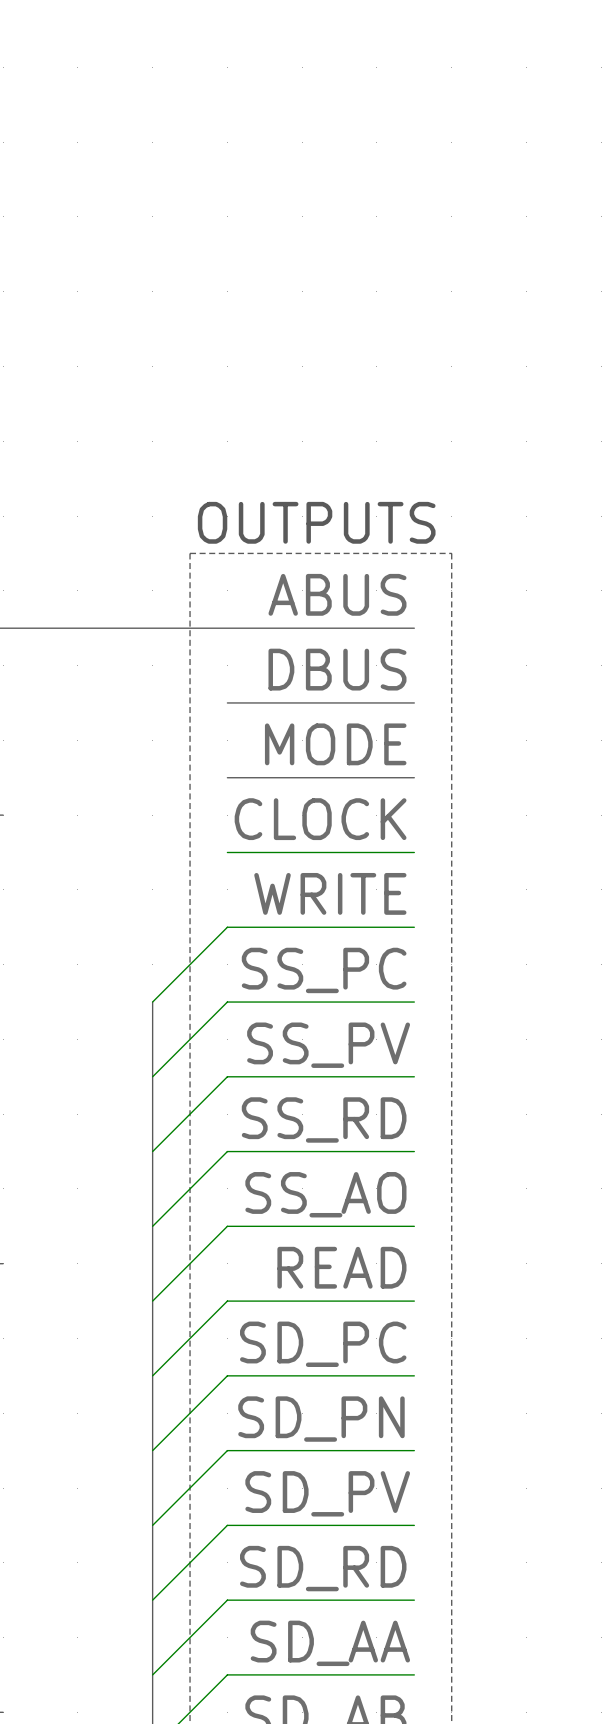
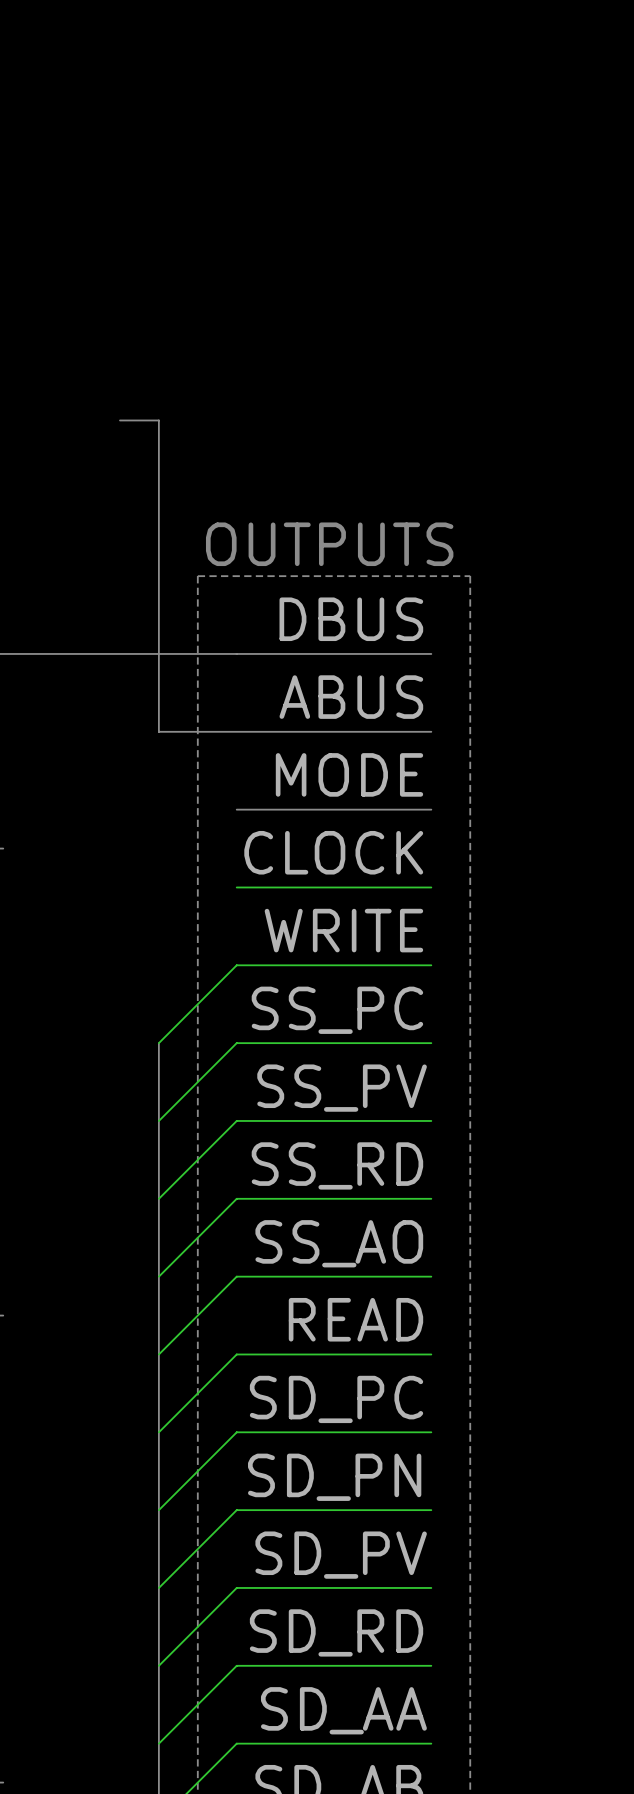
bus: none -> (119, 420) (158, 420) (158, 731) (236, 731)
label: ABUS (337, 594) -> DBUS (351, 619)
label: DBUS (337, 669) -> ABUS (351, 697)

